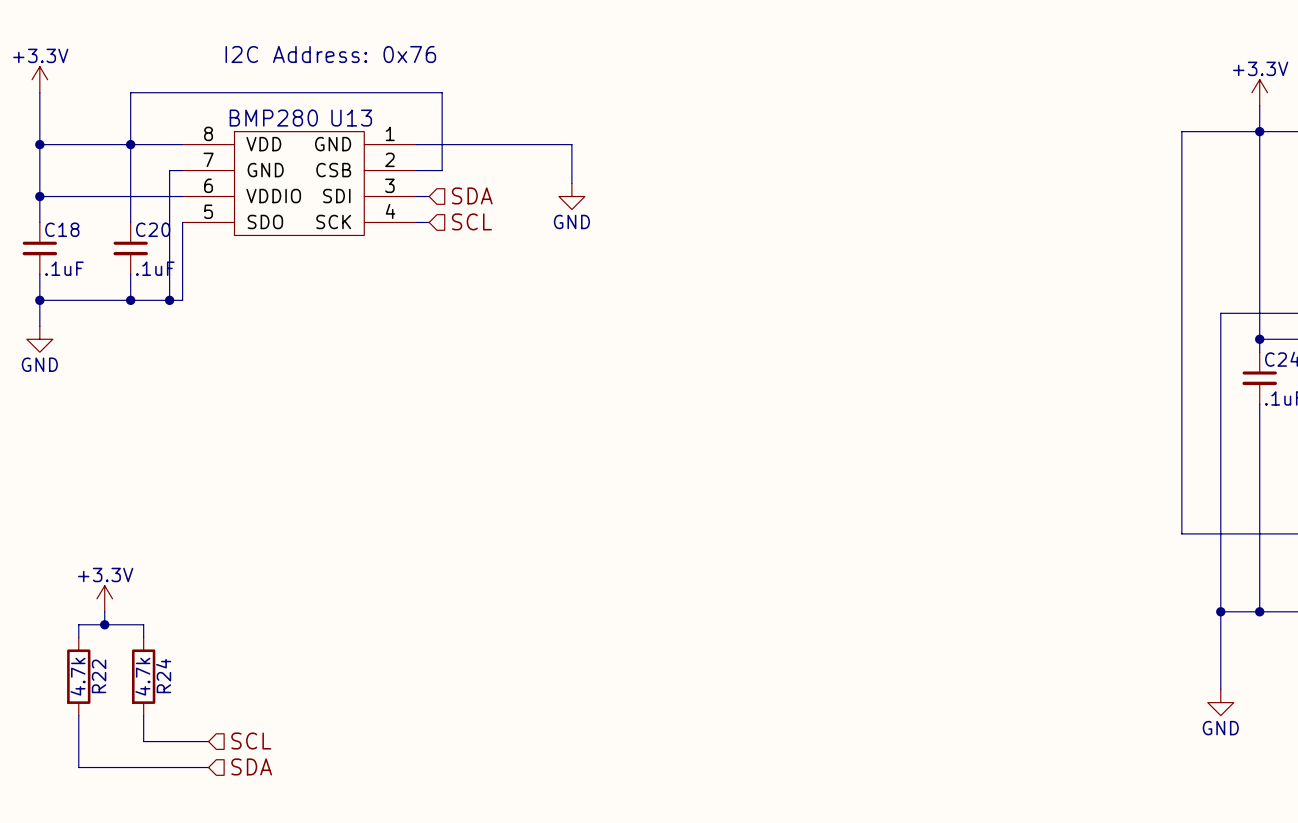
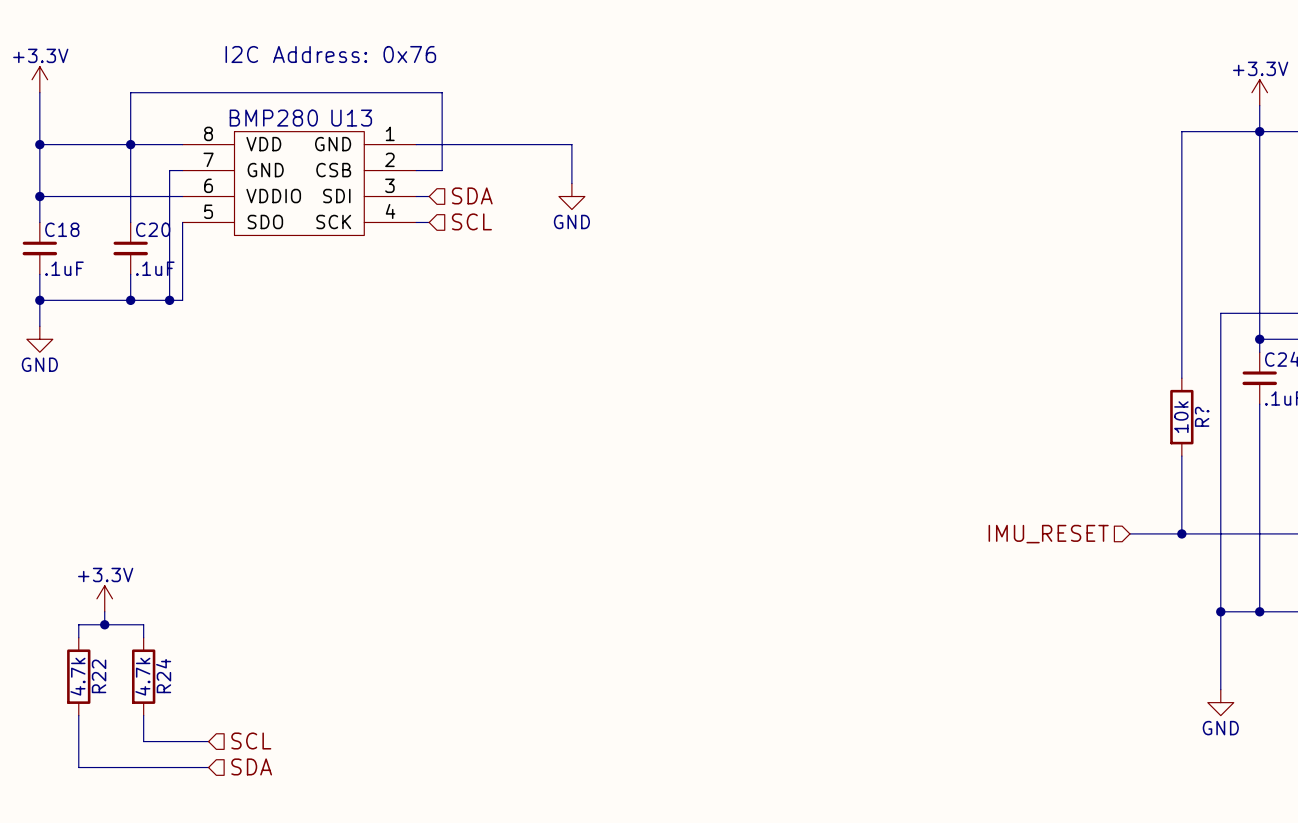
wire: (1181, 378) (1181, 456) -> none
R?: none -> 10k (1181, 417)
wire: none -> (1129, 533) (1181, 533)
junction: none -> (1181, 533)
hierarchical label: none -> IMU_RESET (1048, 534)

